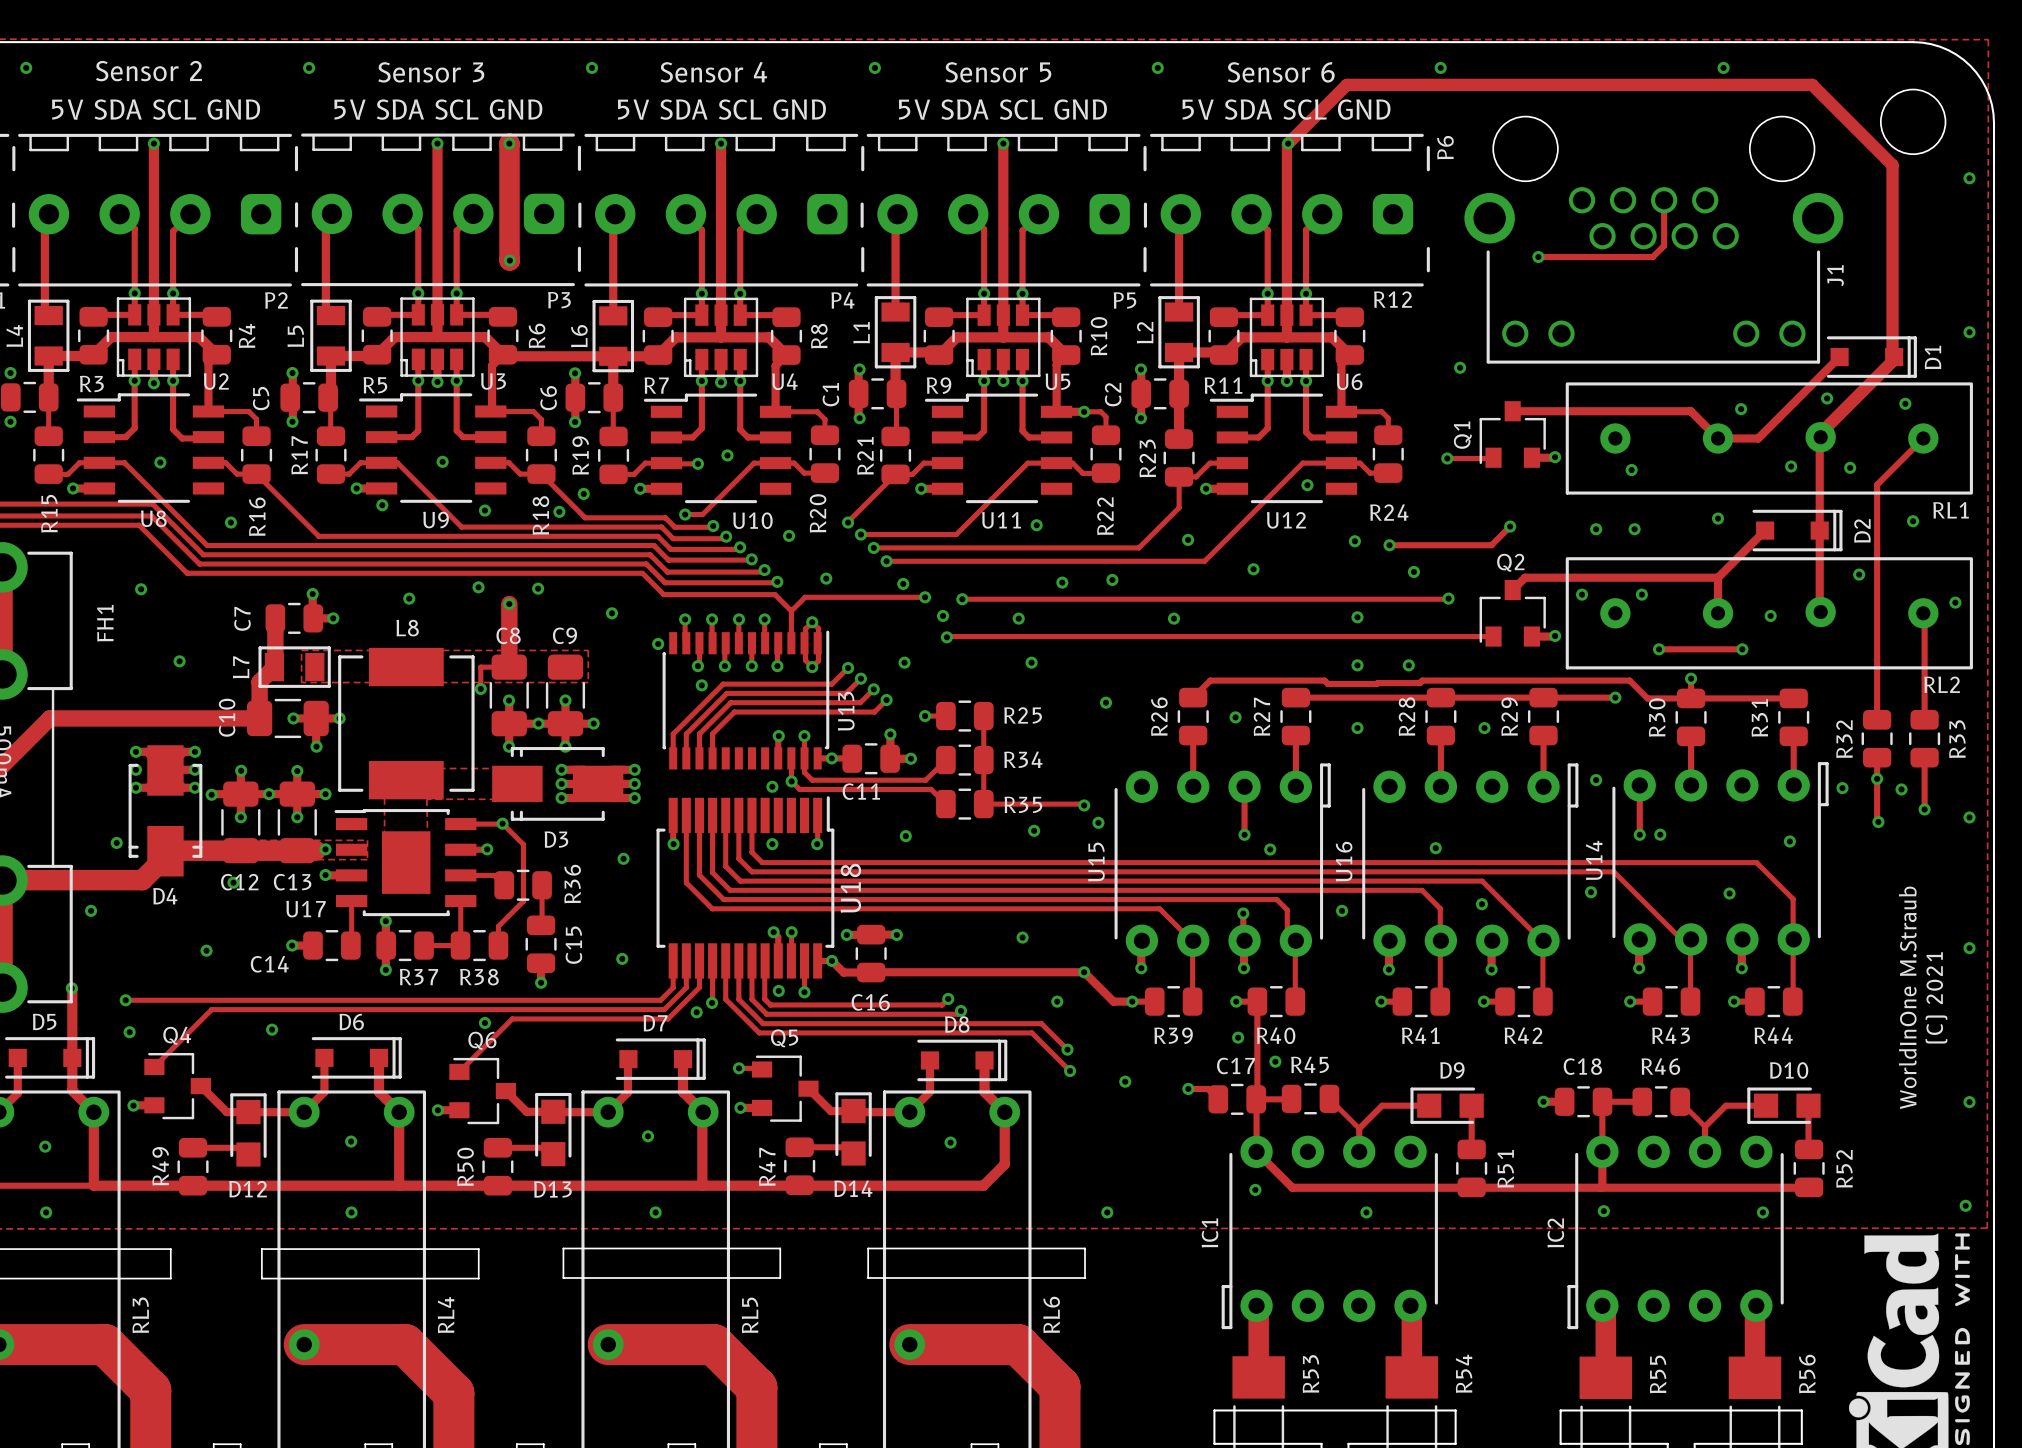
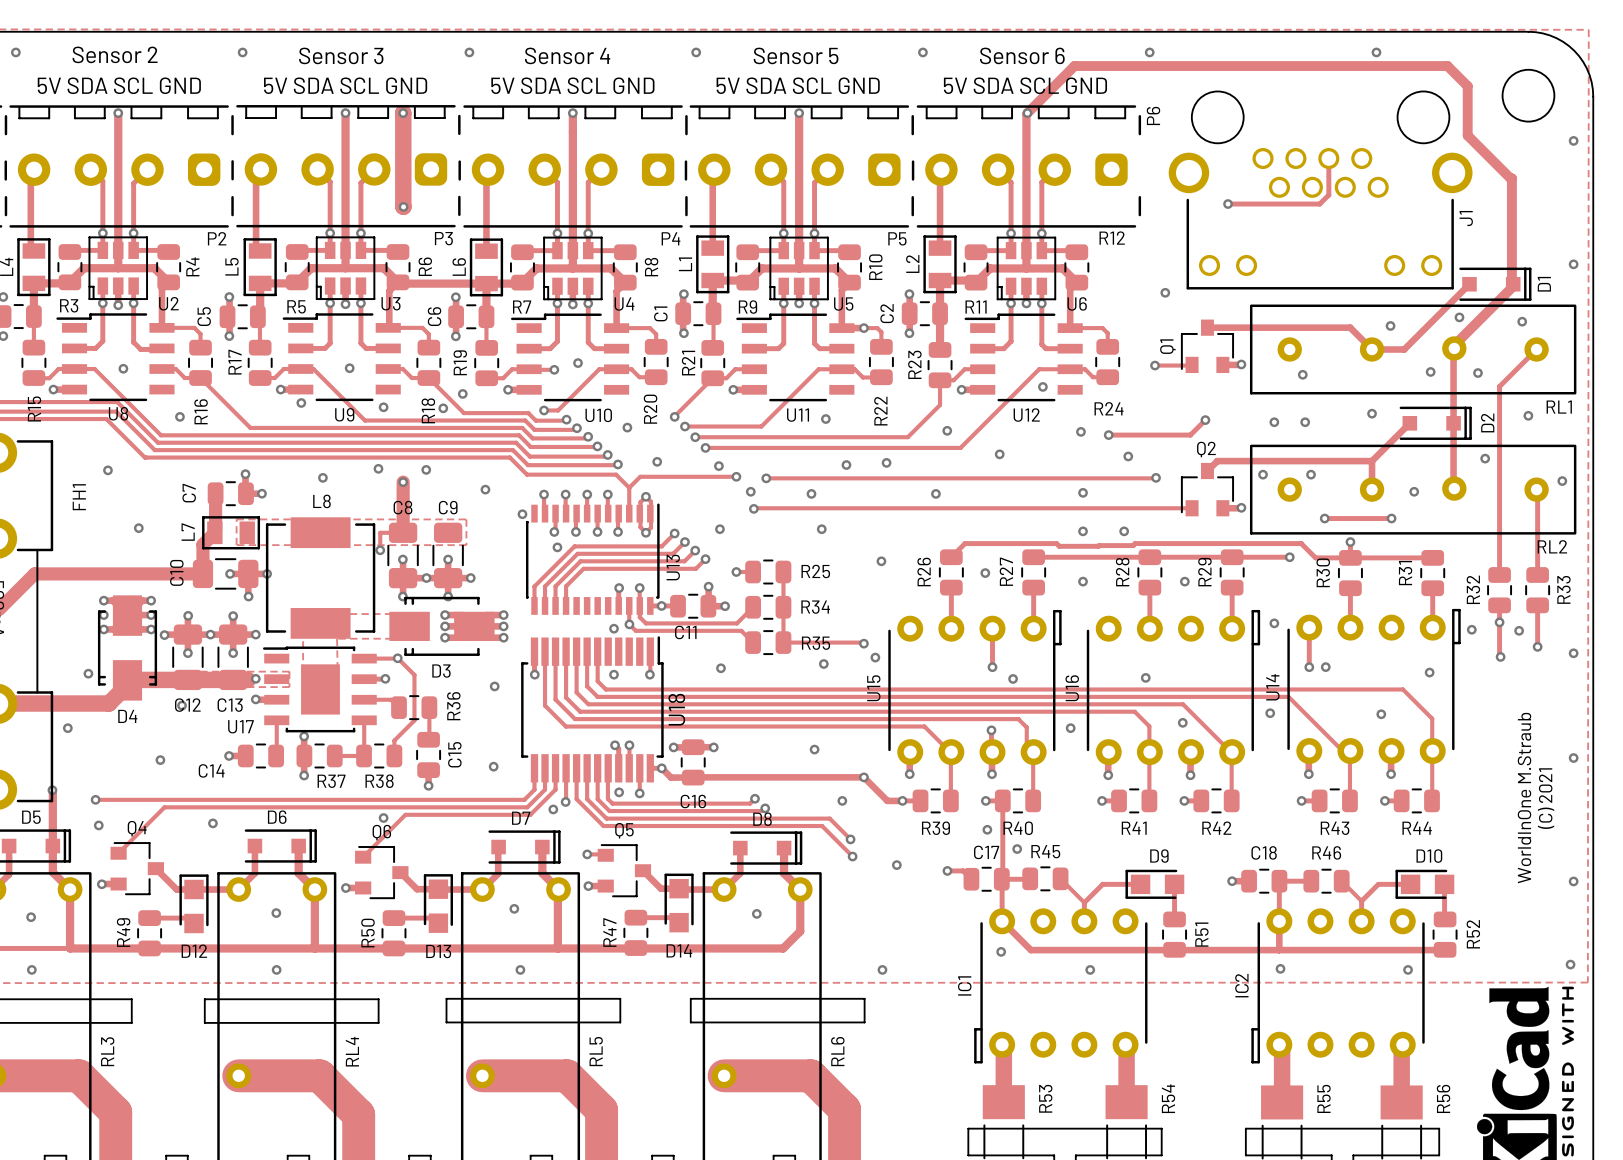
track: (1837, 110) (1892, 165) (1892, 225) -> (1467, 86) (1467, 135) (1511, 178)

